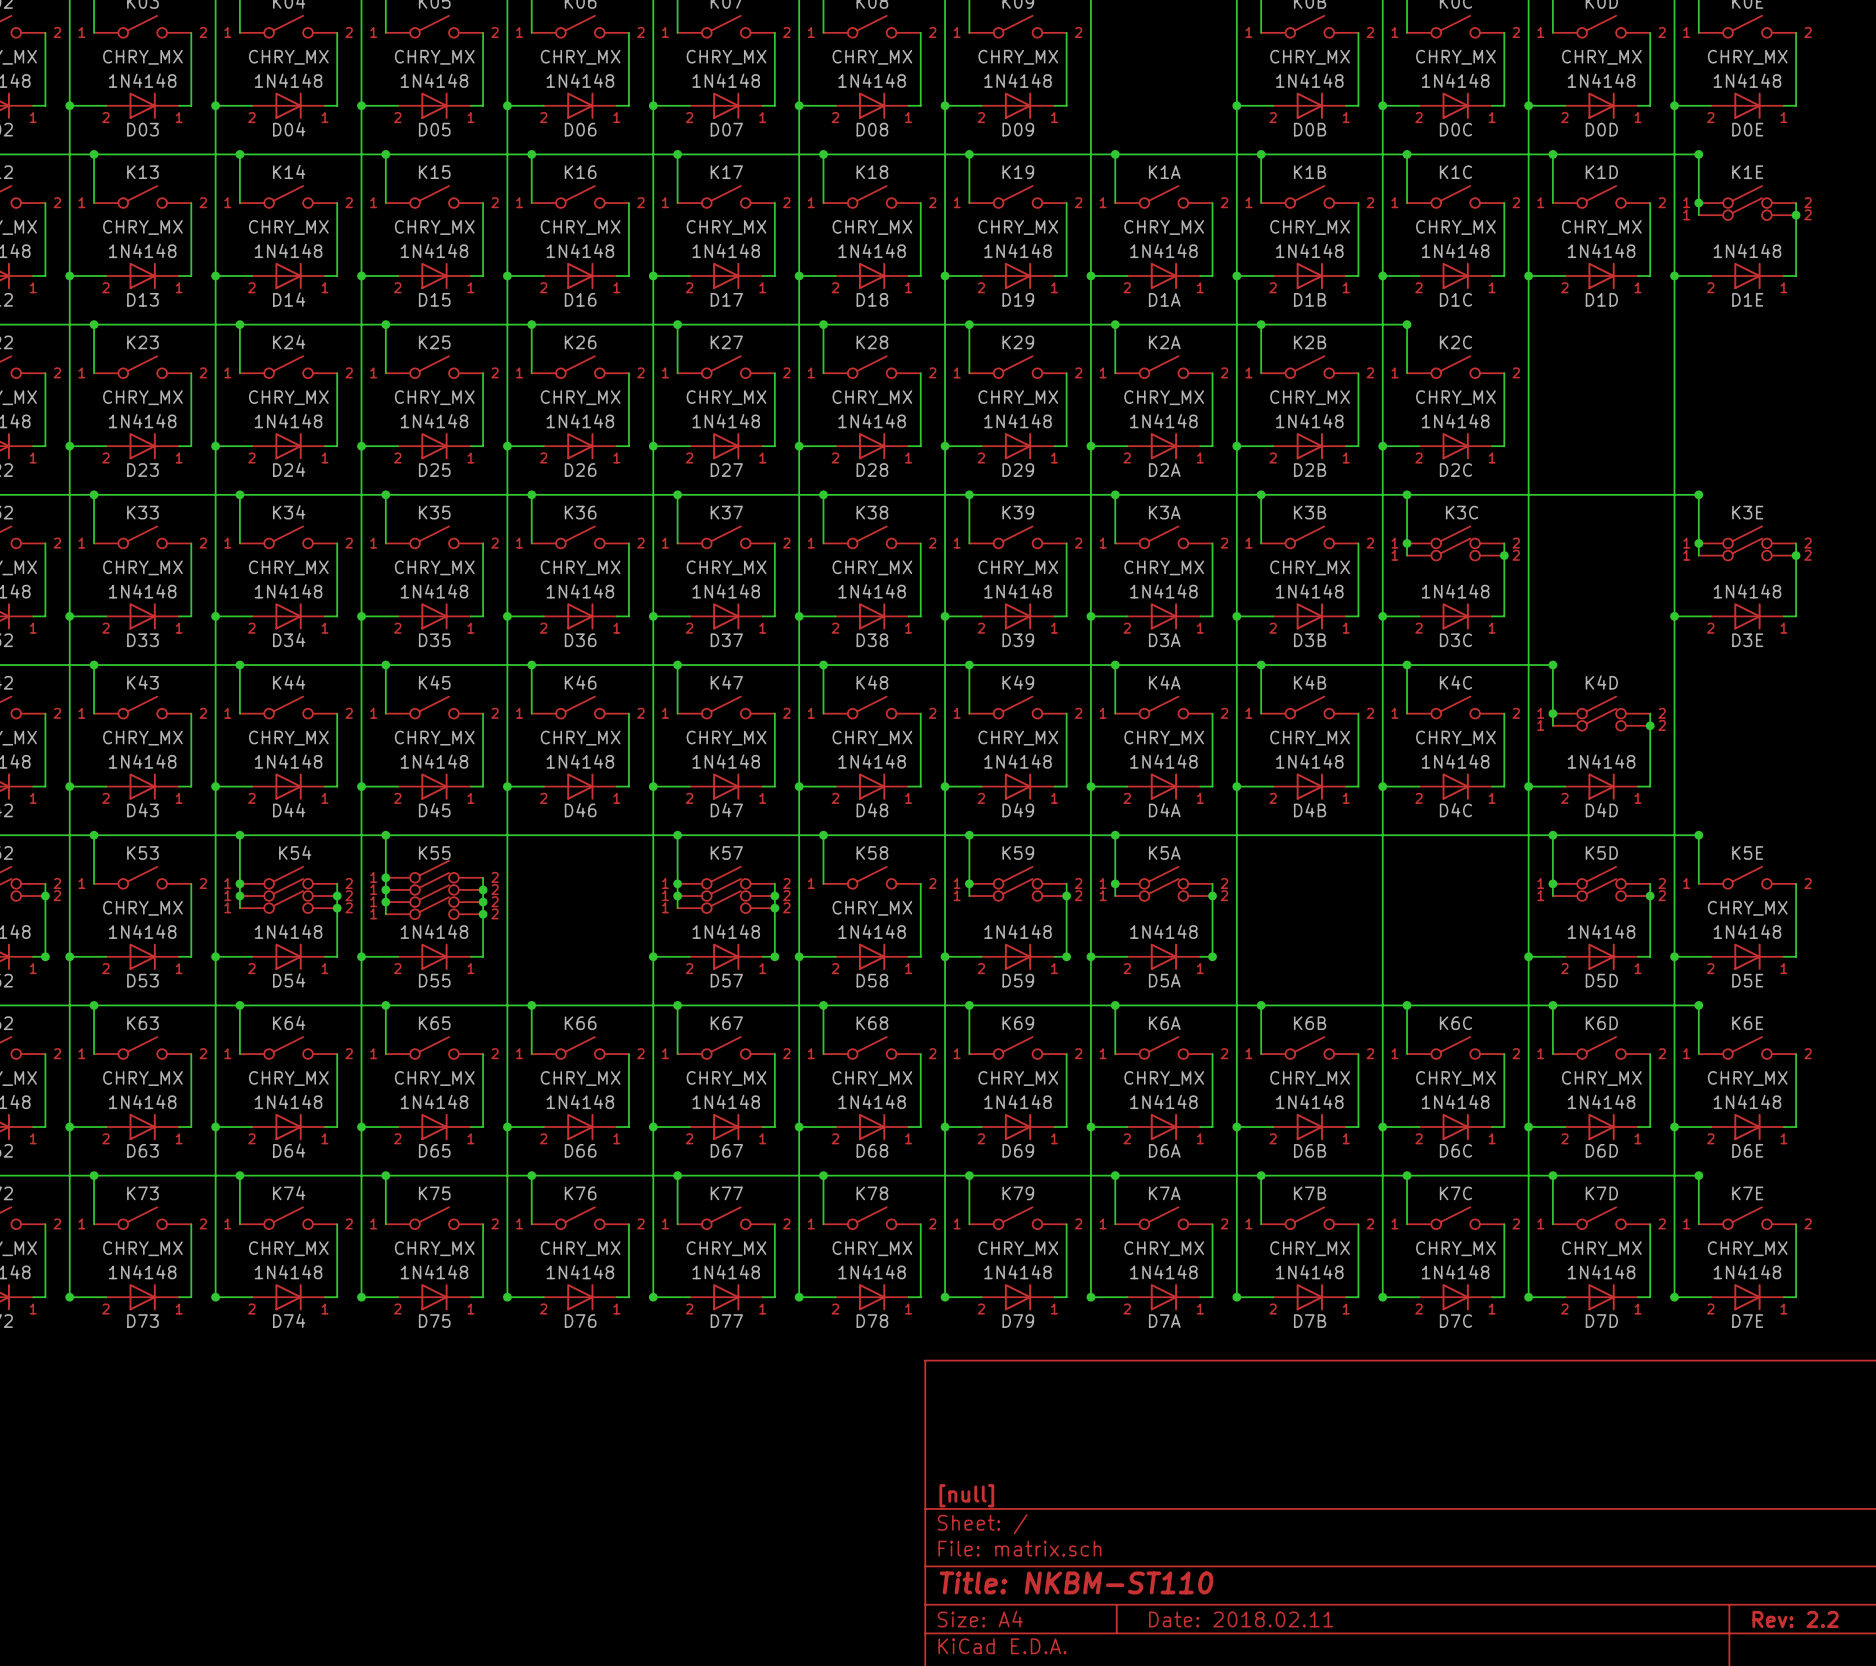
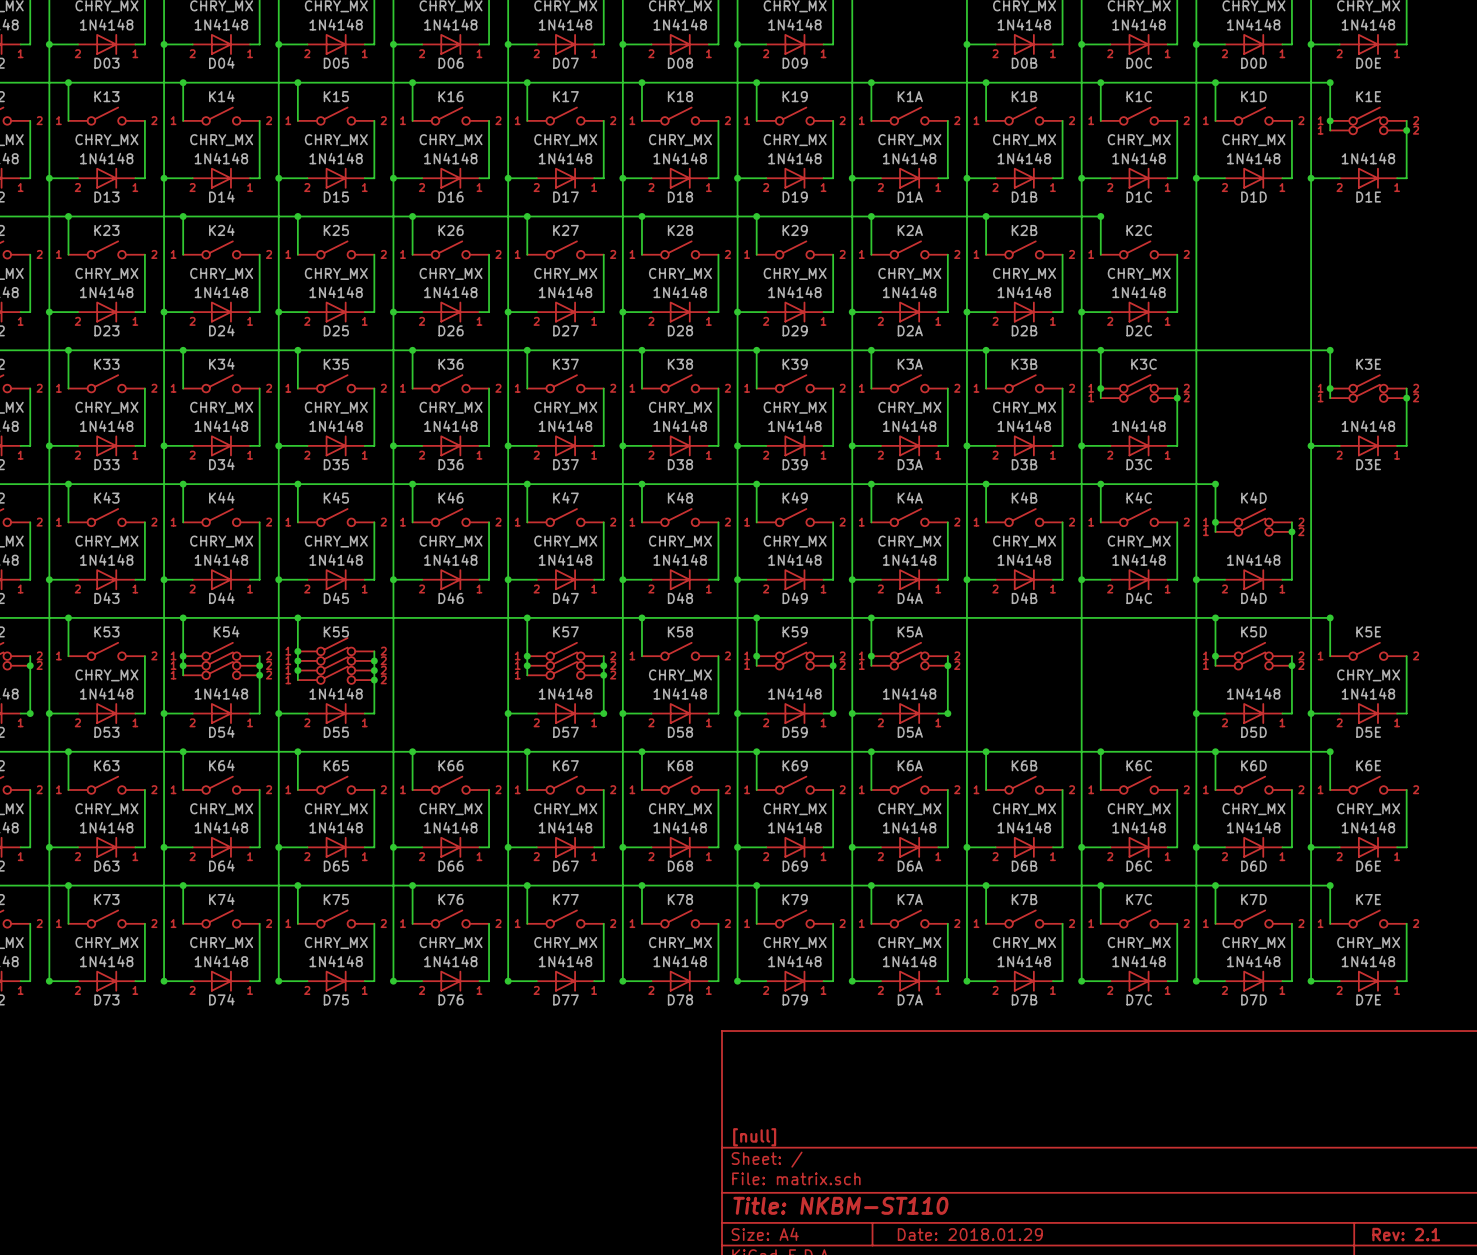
title block: Date: 2018.02.11 (1241, 1619) -> Date: 2018.01.29 (970, 1234)
title block: Rev: 2.2 (1795, 1619) -> Rev: 2.1 (1406, 1234)

